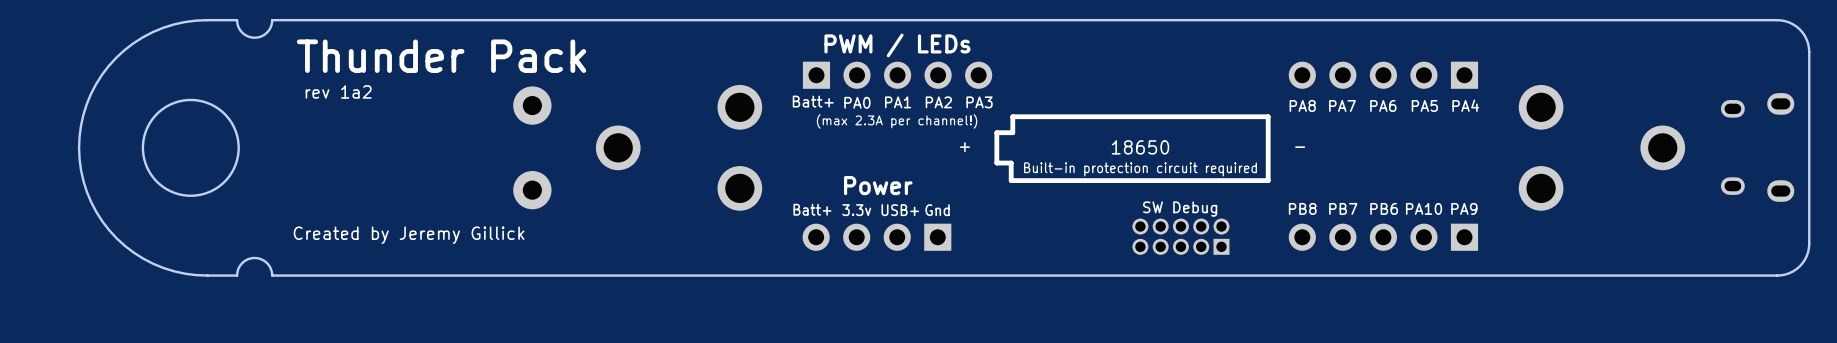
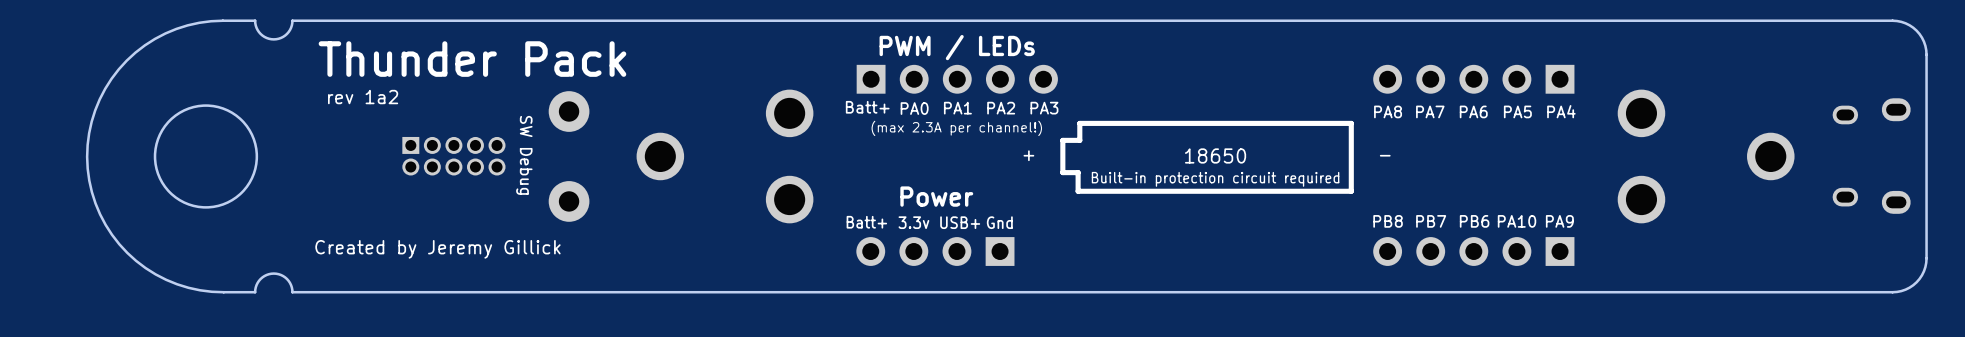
part: none -> SW Debug (453, 156)
part: SW Debug (1180, 236) -> none

